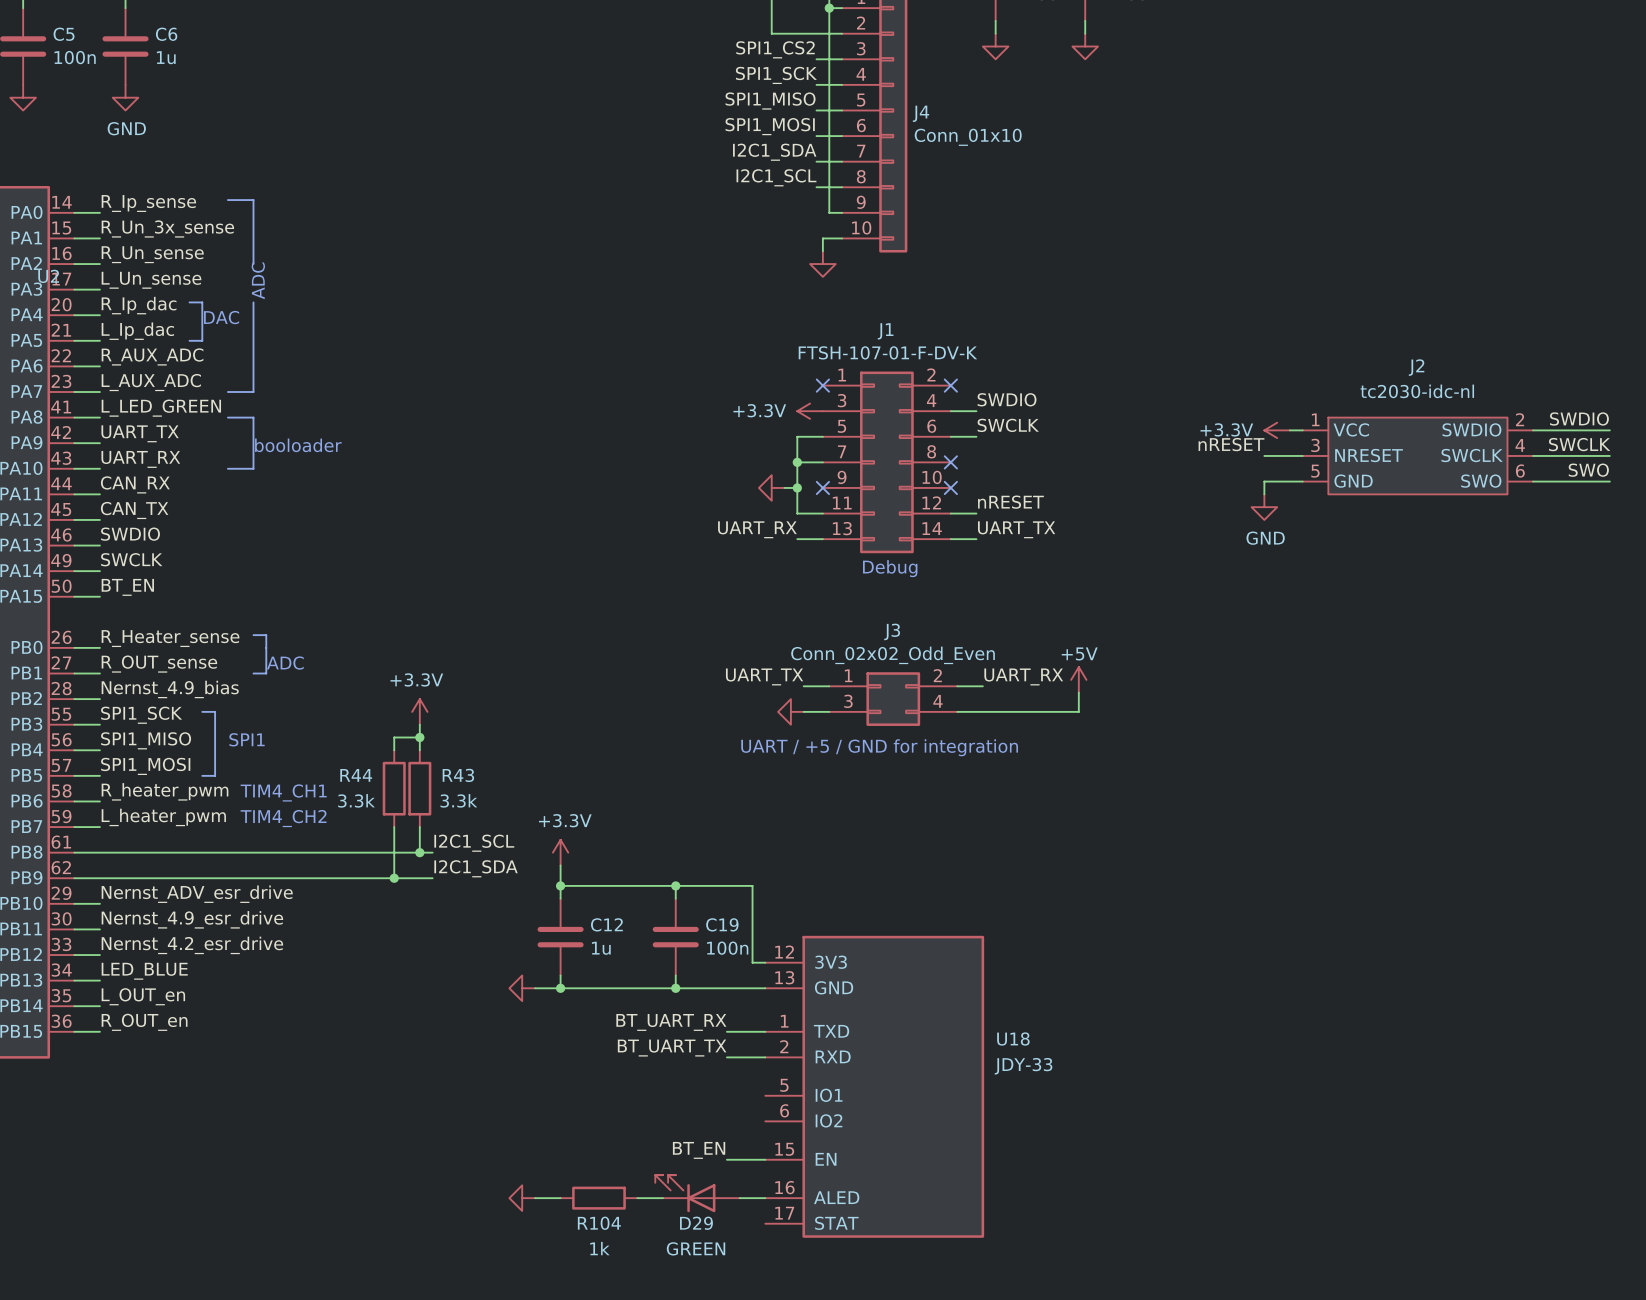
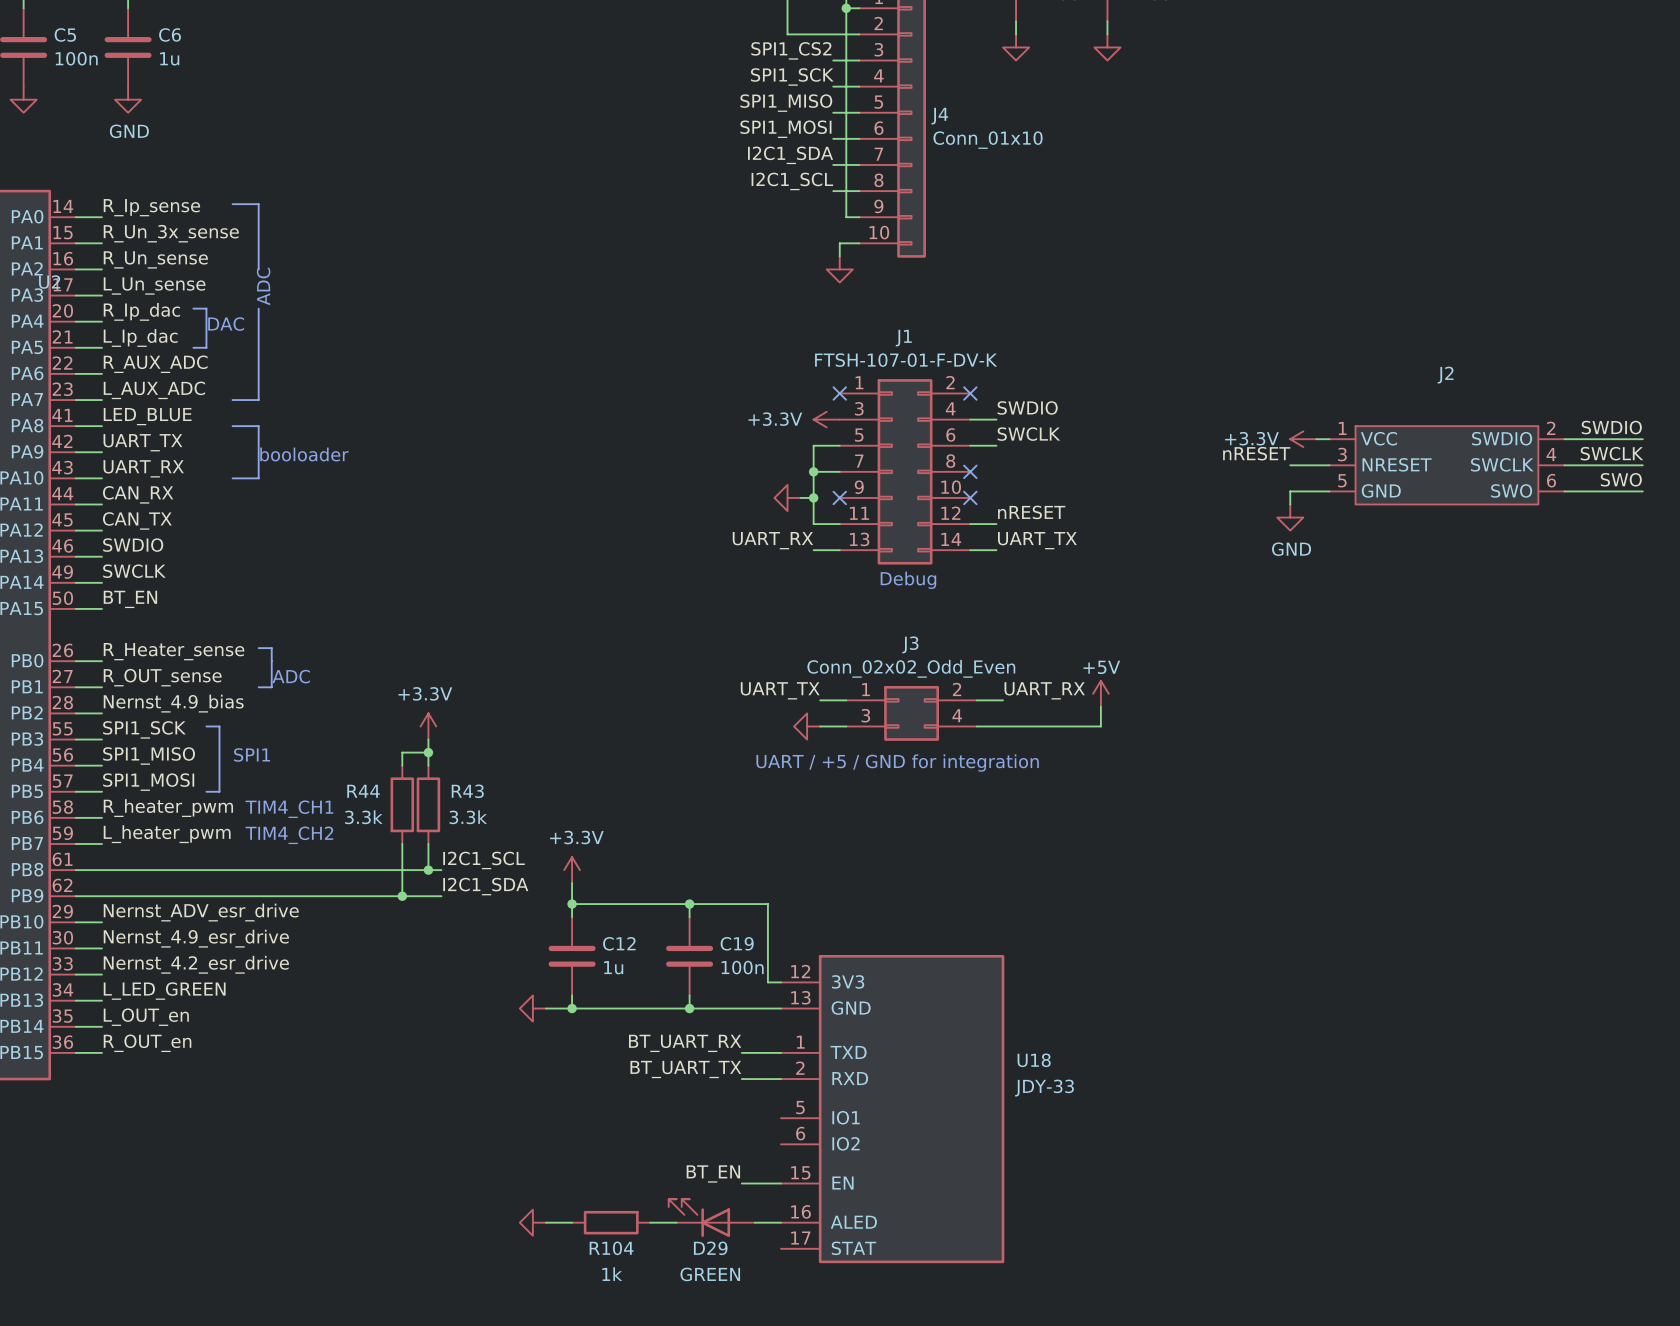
J2 value: tc2030-idc-nl (1417, 391) -> none
label: L_LED_GREEN (161, 408) -> LED_BLUE (147, 416)
label: LED_BLUE (144, 971) -> L_LED_GREEN (164, 991)

